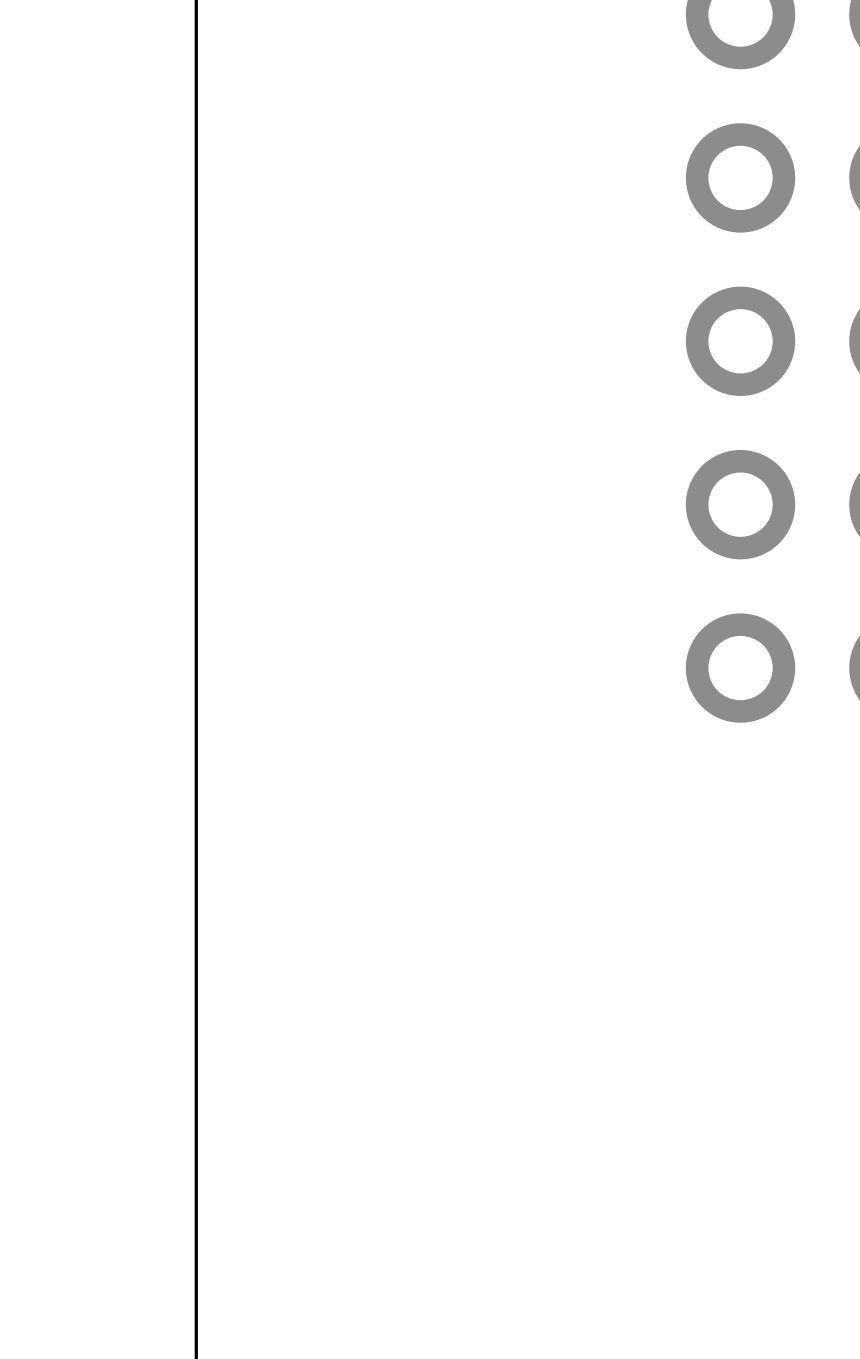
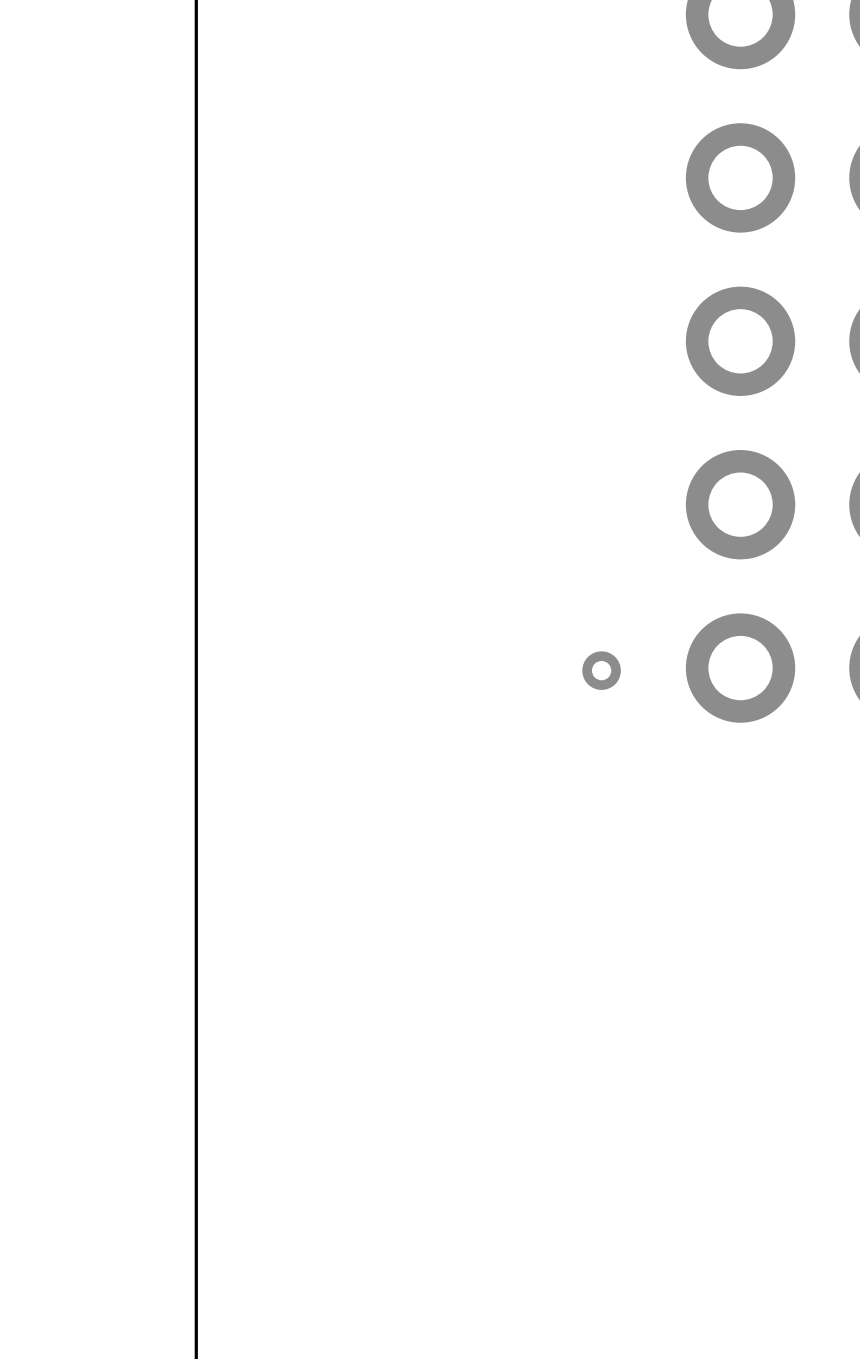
via: none -> (601, 670)

